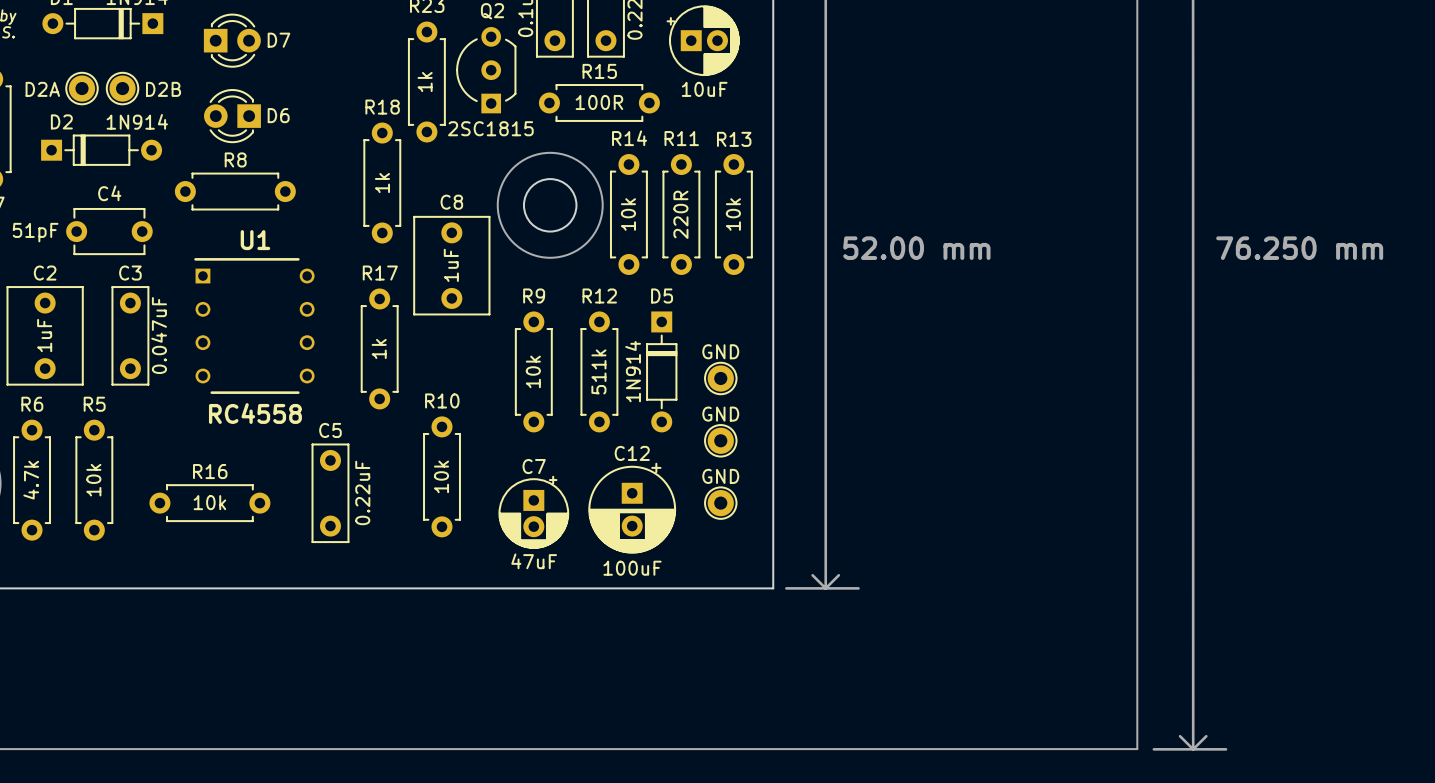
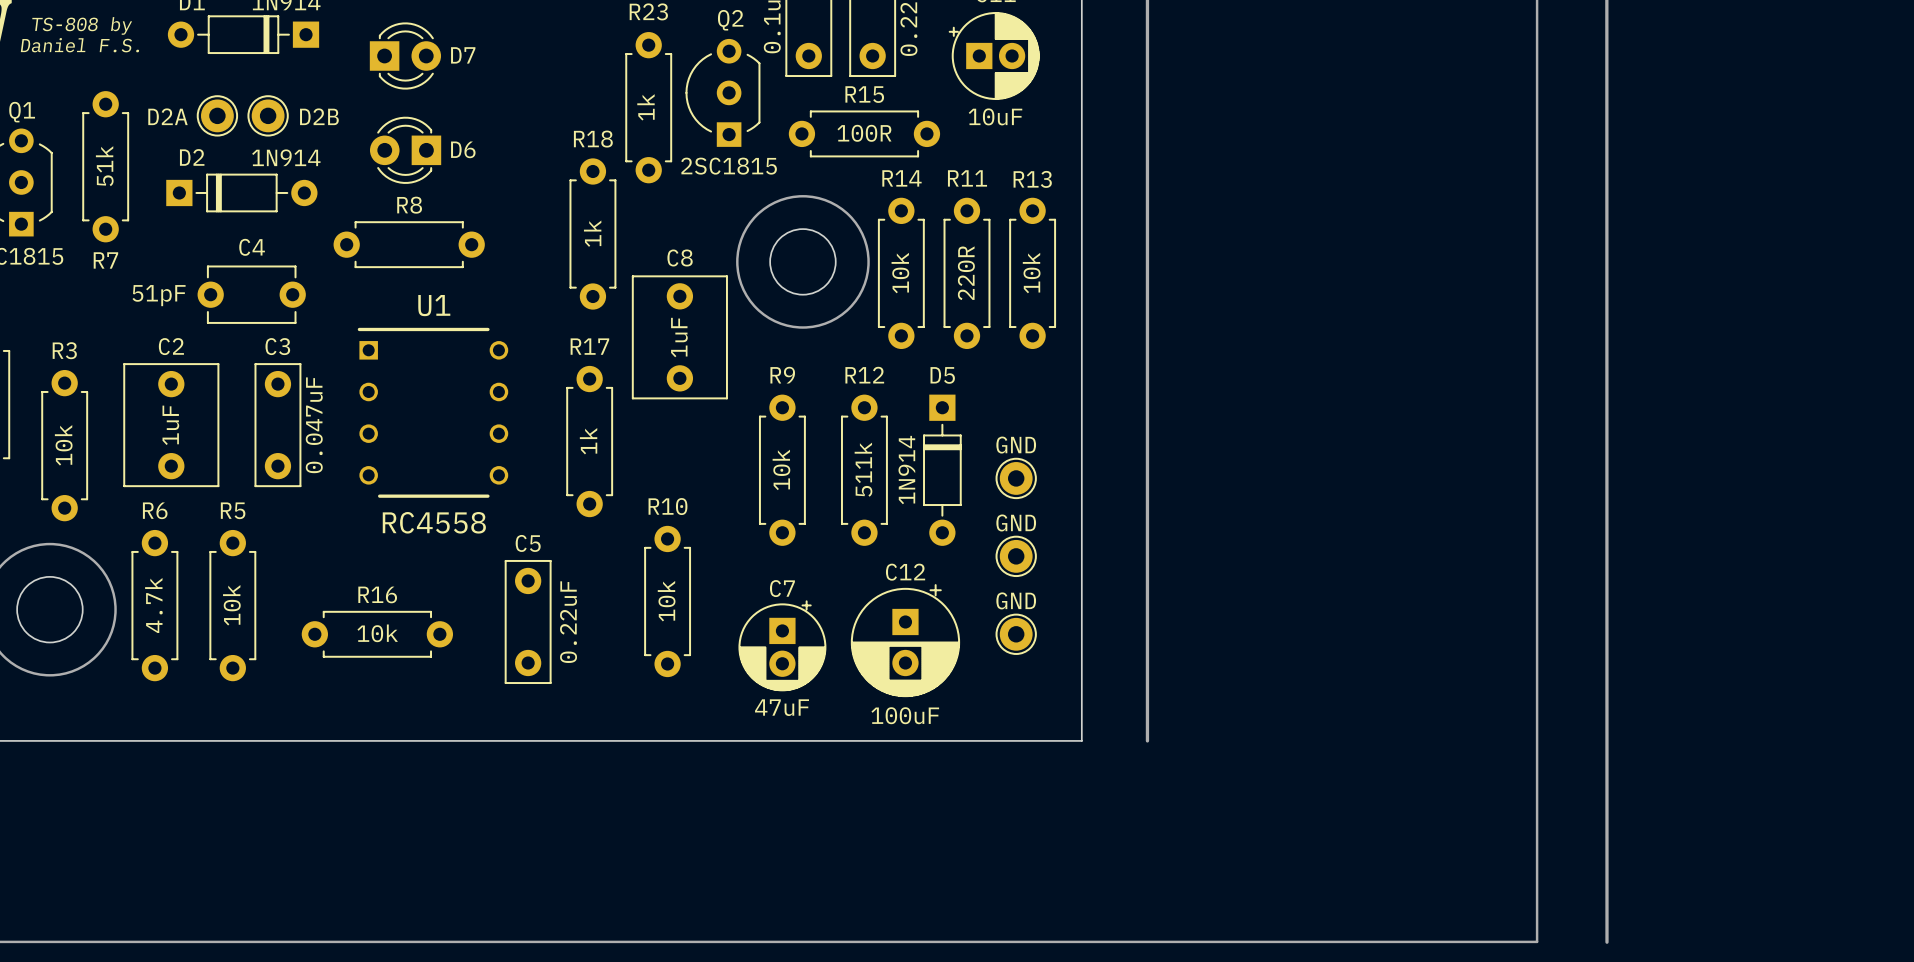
text: 52.00 mm (916, 248) -> none
text: 76.250 mm (1299, 248) -> none
line: (812, 575) (825, 588) (838, 575) -> none
line: (786, 588) (858, 588) -> none
line: (1180, 736) (1193, 749) (1206, 736) -> none
line: (1153, 749) (1226, 749) -> none

